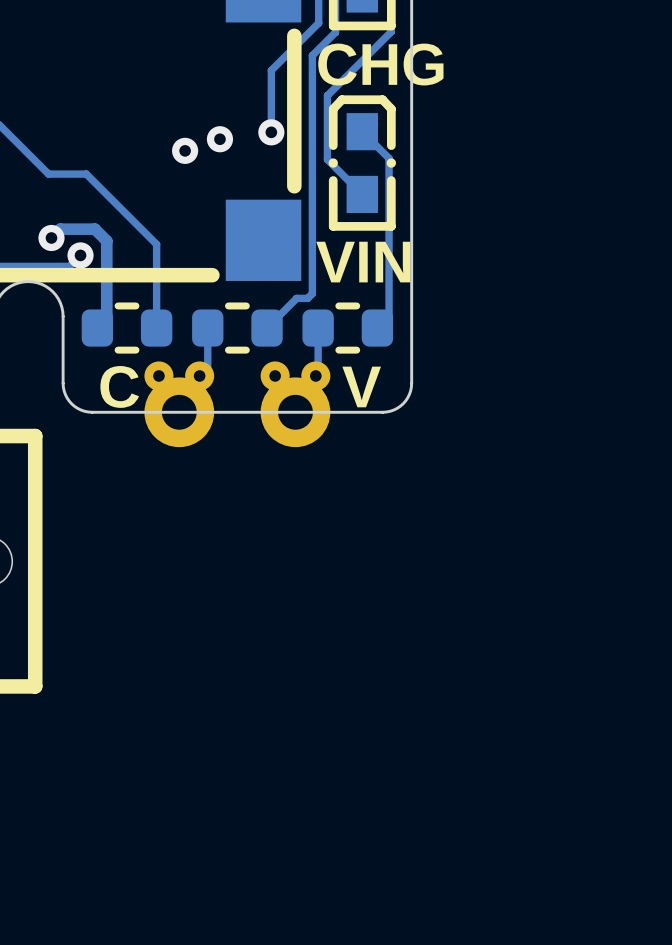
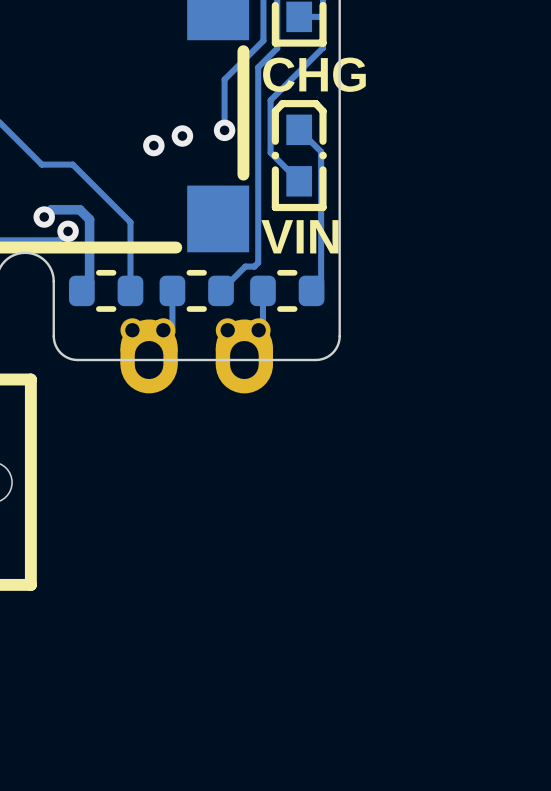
part footprint: [144, 361, 215, 448] -> [120, 318, 178, 394]
part footprint: [260, 361, 331, 448] -> [215, 318, 274, 394]
text: C (119, 386) -> none
text: V (361, 386) -> none

